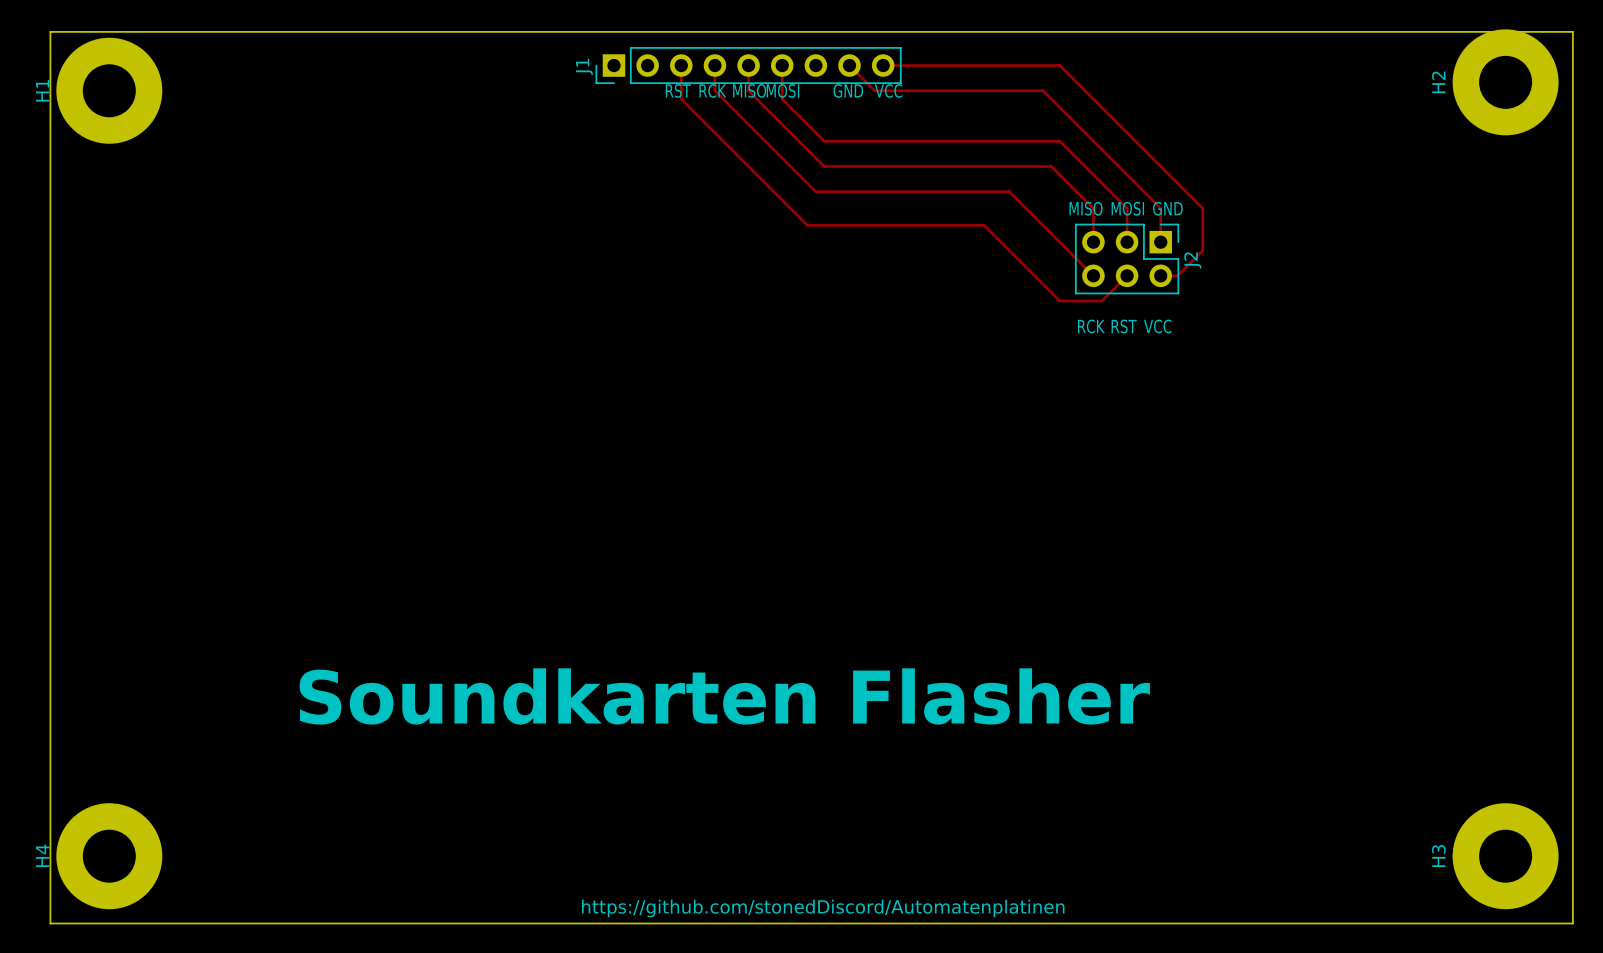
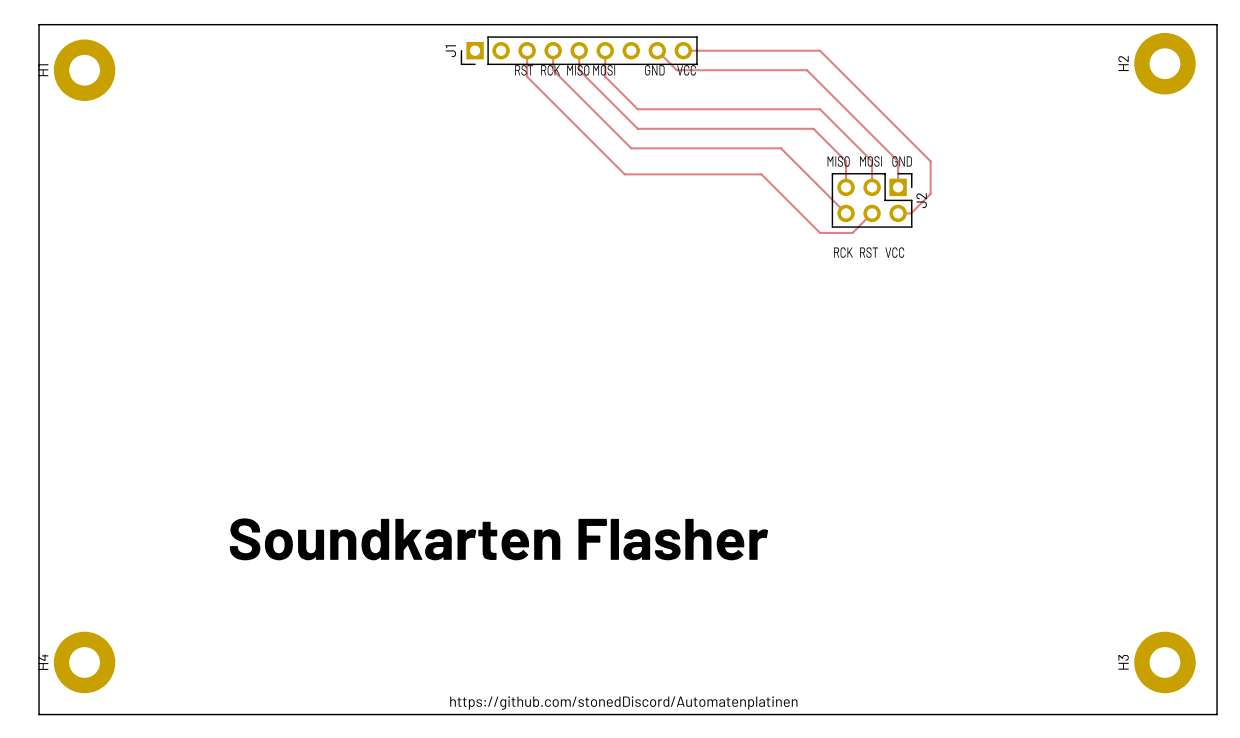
H2 footprint: [1452, 29, 1559, 136] -> [1134, 32, 1196, 95]
H1 footprint: [56, 37, 163, 144] -> [53, 39, 116, 101]
H4 footprint: [56, 803, 163, 910] -> [53, 631, 116, 694]
H3 footprint: [1452, 803, 1559, 910] -> [1134, 631, 1196, 694]

